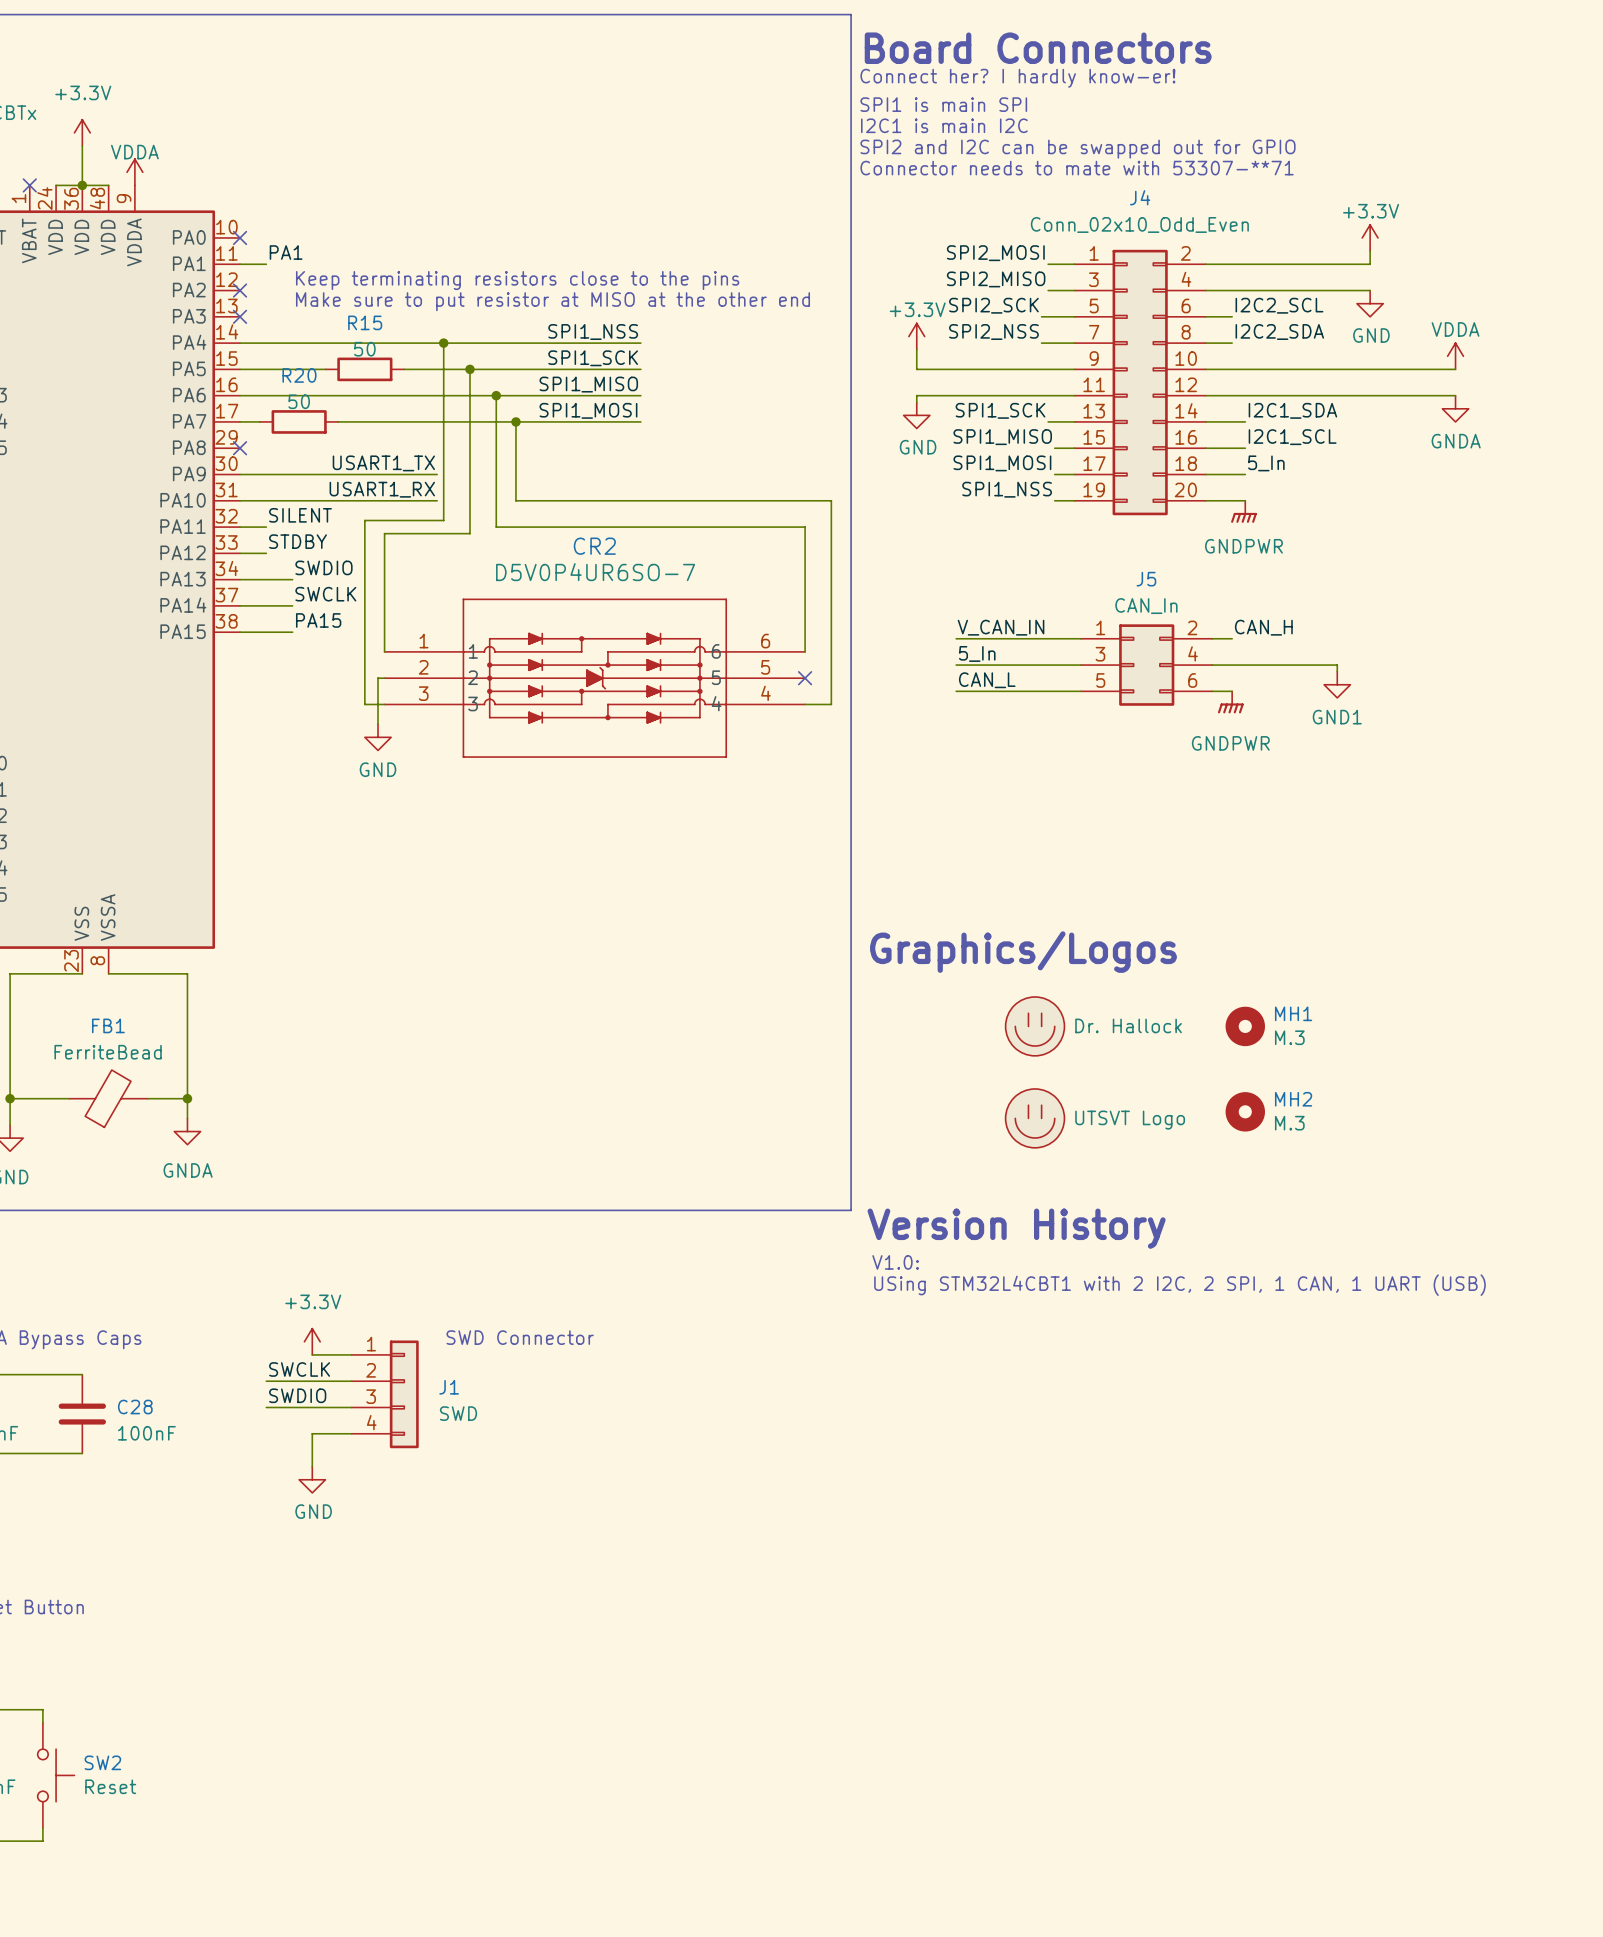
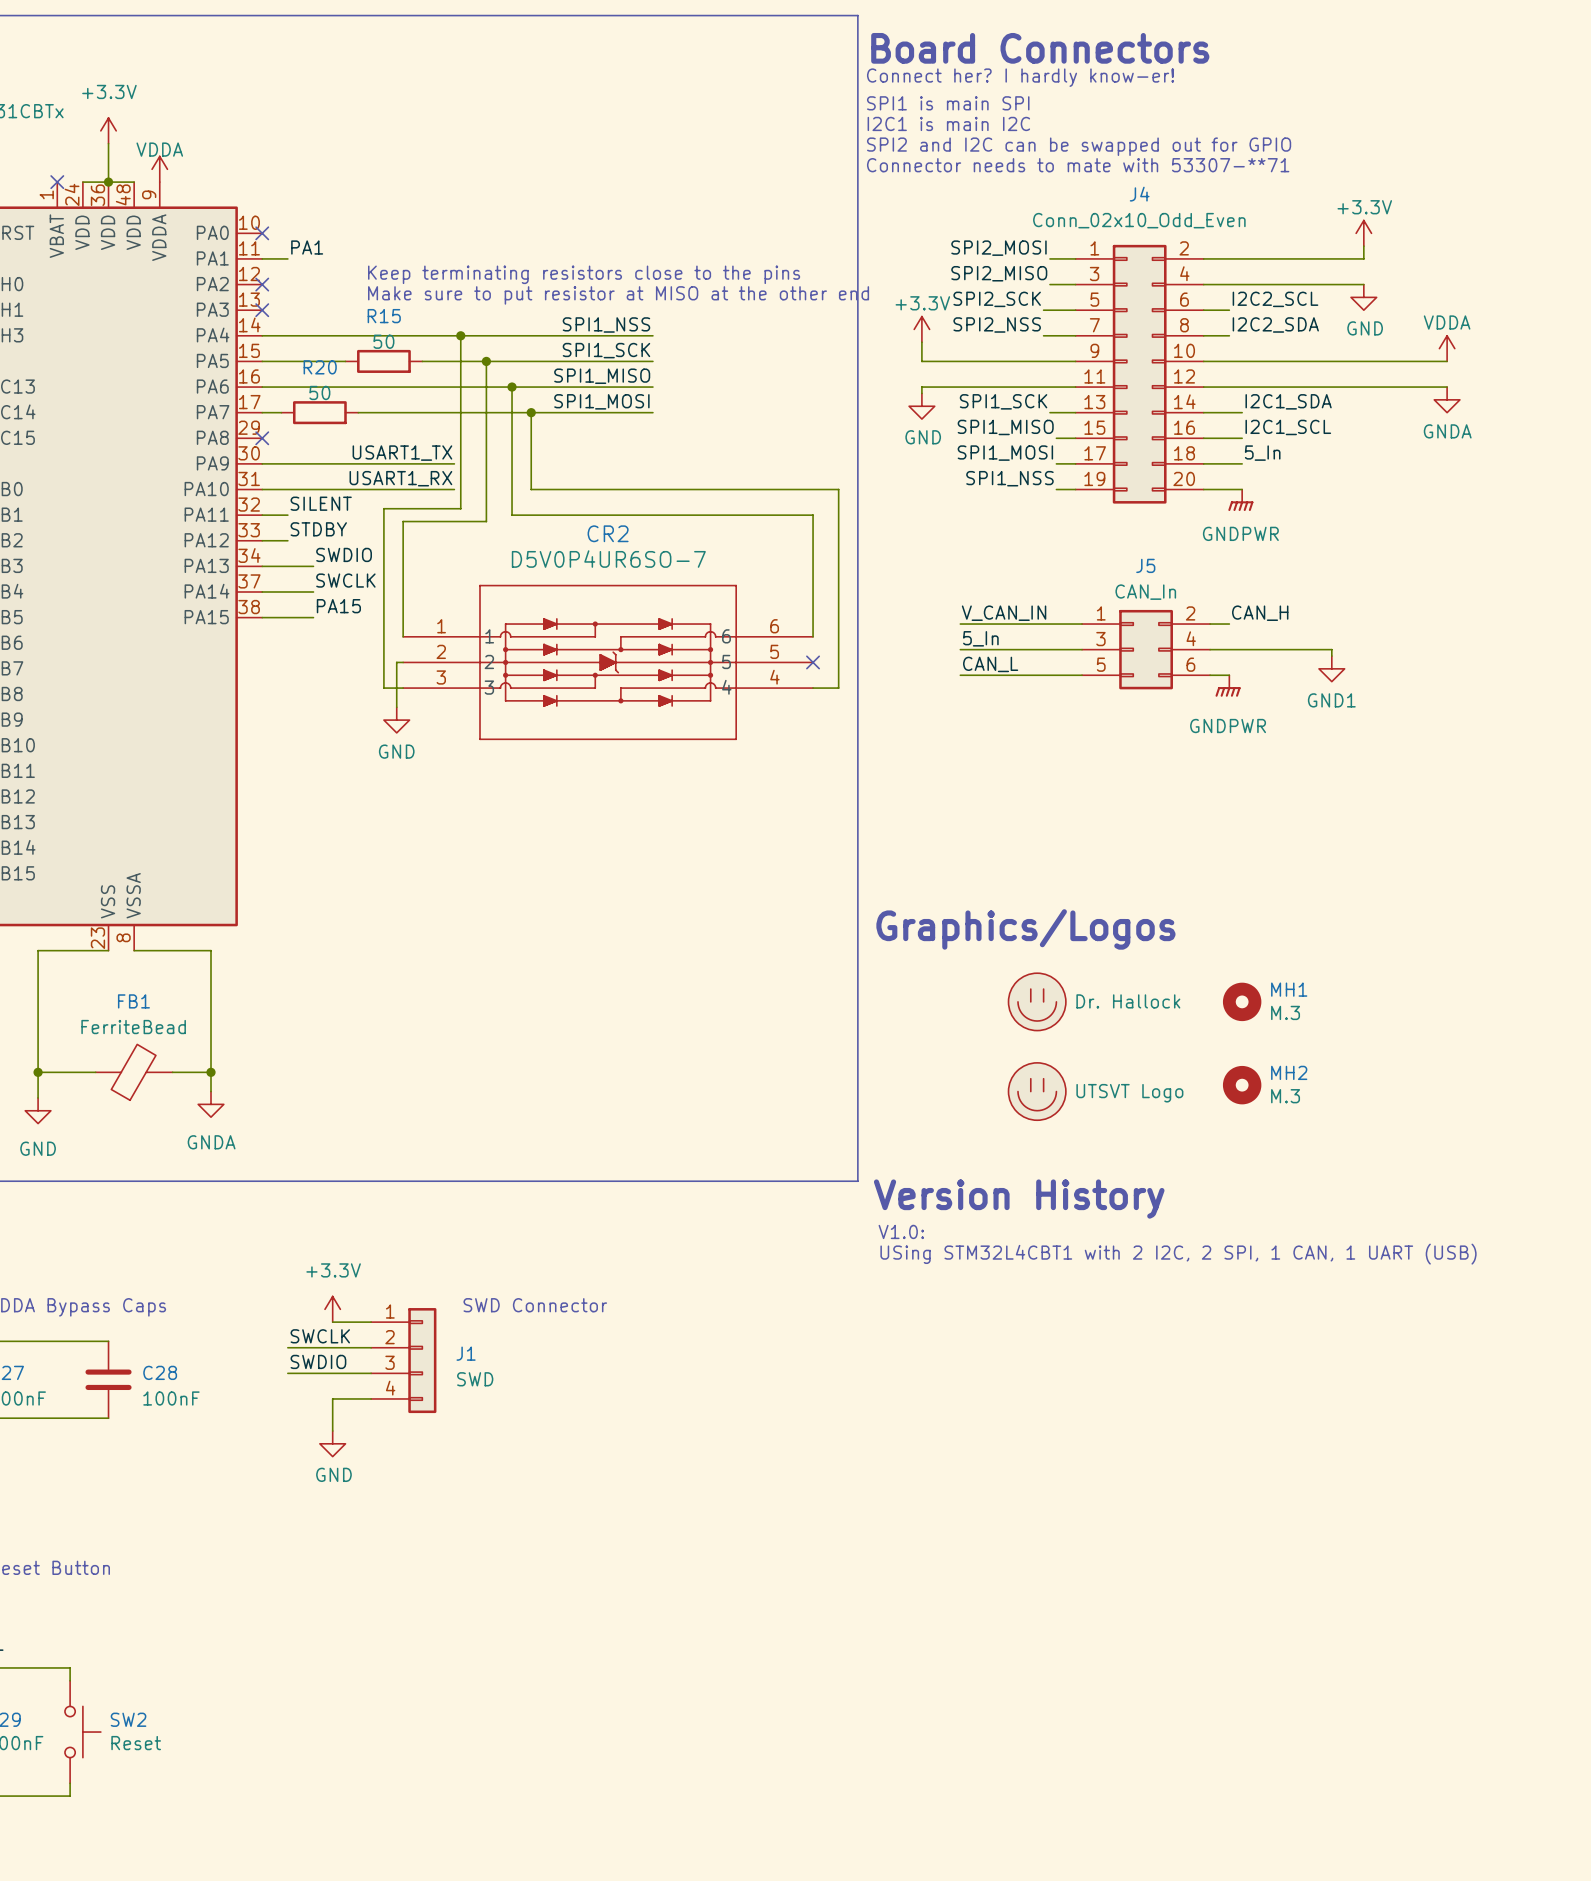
text position: Keep terminating resistors close to the pins (517, 280) -> Keep terminating resistors close to the pins (584, 274)
text position: Make sure to put resistor at MISO at the other end (553, 301) -> Make sure to put resistor at MISO at the other end (618, 295)

